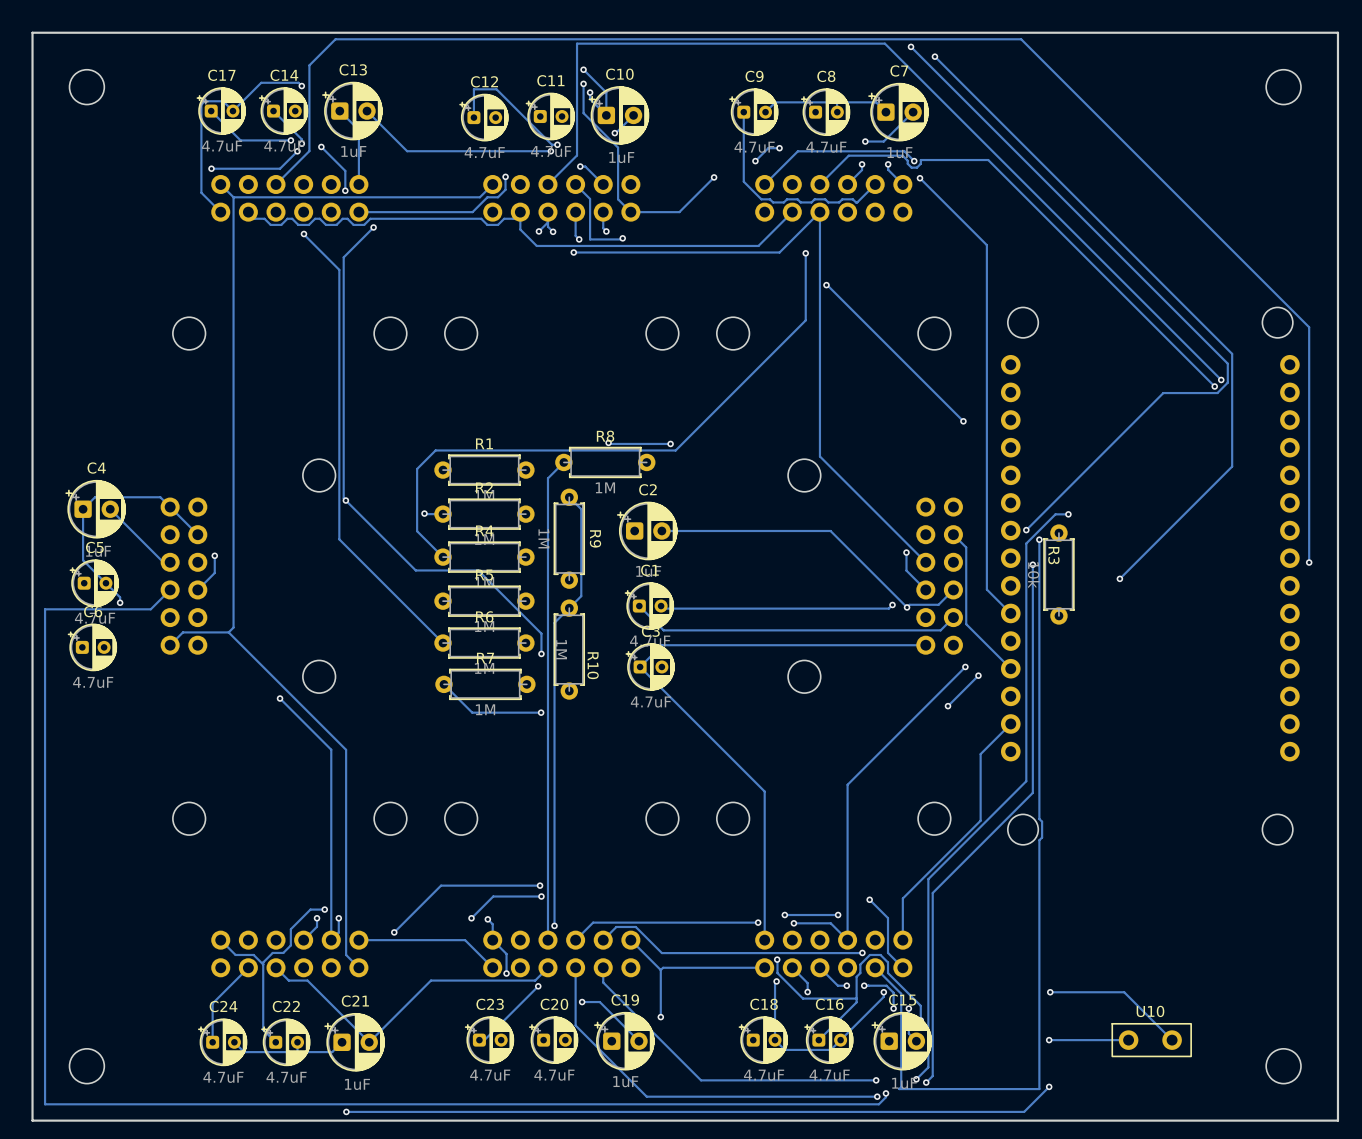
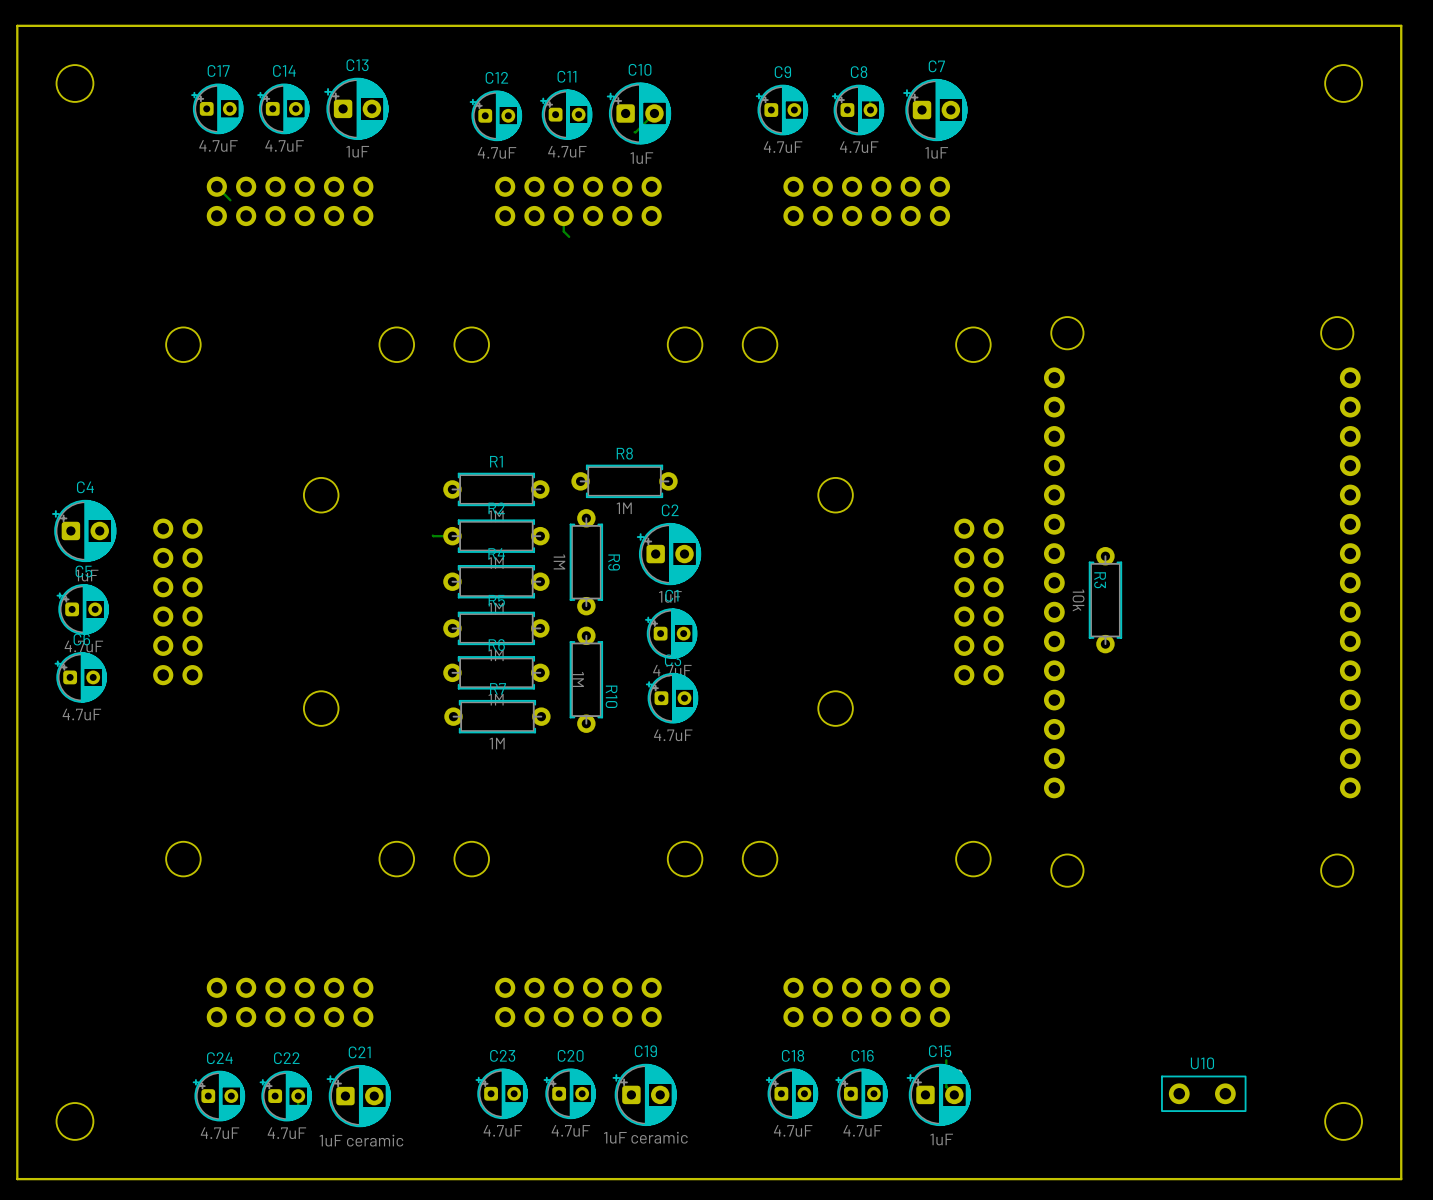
track: (911, 46) (1227, 363) (1227, 382) (1217, 393) (1163, 393) (1026, 530) -> none
via: (911, 46) -> none
track: (934, 56) (1232, 353) (1232, 466) (1119, 578) -> none
via: (934, 56) -> none
track: (583, 69) (606, 92) (606, 115) (590, 99) (590, 92) -> none
via: (583, 69) -> none
track: (583, 83) (583, 113) (618, 147) (618, 199) (630, 212) (679, 212) (714, 177) -> none
via: (583, 83) -> none
track: (301, 86) (298, 82) (261, 82) (232, 111) (223, 101) (204, 101) (201, 104) (201, 192) (220, 212) -> none
via: (301, 86) -> none
via: (590, 92) -> none
track: (211, 111) (240, 140) (290, 140) -> none
track: (273, 111) (301, 139) (301, 143) -> none
track: (339, 111) (358, 130) (358, 184) -> none
track: (367, 111) (407, 151) (550, 151) -> none
track: (743, 112) (743, 181) (761, 199) (769, 199) (773, 202) (783, 202) (787, 199) (797, 199) (800, 202) (811, 202) (814, 199) (839, 202) (842, 199) (852, 199) (857, 202) (875, 184) -> none
track: (885, 112) (876, 102) (775, 102) (765, 112) -> none
track: (913, 112) (883, 141) (865, 141) -> none
track: (473, 117) (473, 89) (496, 89) (552, 144) (557, 144) -> none
via: (614, 133) -> none
via: (290, 140) -> none
via: (865, 141) -> none
via: (301, 143) -> none
via: (557, 144) -> none
track: (321, 146) (345, 170) (345, 190) -> none
via: (321, 146) -> none
track: (779, 148) (768, 148) (755, 161) -> none
via: (779, 148) -> none
track: (297, 151) (280, 168) (211, 168) -> none
via: (297, 151) -> none
via: (550, 151) -> none
via: (755, 161) -> none
track: (914, 161) (904, 151) (797, 151) (764, 184) -> none
via: (914, 161) -> none
track: (862, 164) (862, 170) (847, 184) -> none
via: (862, 164) -> none
track: (888, 164) (888, 169) (902, 184) -> none
via: (888, 164) -> none
track: (580, 166) (585, 166) (603, 184) -> none
via: (580, 166) -> none
via: (211, 168) -> none
track: (505, 176) (505, 189) (498, 197) (487, 197) (472, 212) (358, 212) -> none
via: (505, 176) -> none
via: (714, 177) -> none
track: (919, 178) (986, 245) (986, 589) (1010, 613) -> none
via: (919, 178) -> none
track: (276, 184) (309, 151) (309, 65) (335, 39) (1021, 39) (1309, 327) (1309, 562) -> none
track: (492, 184) (479, 197) (233, 197) (233, 627) (228, 632) -> none
track: (547, 184) (577, 155) (577, 43) (884, 43) (1221, 379) -> none
track: (575, 184) (590, 198) (590, 239) (622, 238) -> none
track: (819, 184) (848, 155) (902, 155) (911, 167) (916, 167) (920, 163) (920, 160) (988, 160) (1214, 386) -> none
via: (345, 190) -> none
track: (575, 212) (575, 235) (579, 239) -> none
track: (603, 212) (603, 228) (606, 231) -> none
track: (792, 212) (758, 245) (536, 245) (520, 229) (520, 212) (513, 218) (504, 218) (498, 224) (487, 224) (481, 218) (370, 218) (364, 224) (353, 224) (347, 218) (342, 218) (336, 224) (325, 224) (319, 218) (315, 218) (308, 224) (298, 224) (292, 218) (287, 218) (281, 224) (270, 224) (264, 218) (255, 218) (248, 212) -> none
track: (547, 222) (538, 231) -> none
track: (373, 227) (343, 257) (343, 498) (415, 570) (478, 570) (541, 633) (541, 653) -> none
via: (373, 227) -> none
via: (538, 231) -> none
via: (553, 231) -> none
via: (606, 231) -> none
track: (303, 234) (339, 269) (339, 539) (443, 643) -> none
via: (303, 234) -> none
via: (622, 238) -> none
via: (579, 239) -> none
track: (573, 252) (779, 252) (819, 212) (819, 456) (925, 562) -> none
via: (573, 252) -> none
track: (805, 253) (805, 320) (675, 450) (435, 450) (417, 468) (417, 531) (443, 557) -> none
via: (805, 253) -> none
track: (826, 285) (963, 421) -> none
via: (826, 285) -> none
via: (1221, 379) -> none
via: (1214, 386) -> none
via: (963, 421) -> none
track: (608, 442) (670, 443) -> none
via: (608, 442) -> none
via: (670, 443) -> none
track: (563, 462) (547, 478) (547, 940) -> none
track: (569, 497) (581, 509) (581, 596) (554, 622) (554, 925) -> none
via: (345, 500) -> none
track: (110, 509) (163, 562) (170, 562) -> none
via: (424, 513) -> none
track: (1068, 514) (1055, 514) (1026, 543) (1026, 781) (928, 879) (928, 1067) (916, 1079) -> none
via: (1068, 514) -> none
track: (661, 530) (830, 530) (907, 607) (909, 604) (938, 604) (953, 589) -> none
via: (1026, 530) -> none
track: (197, 534) (160, 497) (95, 497) (83, 509) (83, 560) (120, 597) (120, 602) -> none
track: (953, 534) (966, 547) (966, 624) (1010, 668) -> none
track: (1039, 539) (1039, 818) (1042, 821) (1042, 837) (1039, 840) (1039, 1089) (899, 1089) (901, 1087) (901, 993) (875, 967) -> none
via: (1039, 539) -> none
track: (906, 552) (906, 570) (925, 589) -> none
via: (906, 552) -> none
track: (214, 555) (214, 572) (197, 589) -> none
via: (214, 555) -> none
via: (1309, 562) -> none
track: (1032, 564) (1032, 792) (932, 893) (932, 1076) (926, 1082) -> none
via: (1032, 564) -> none
via: (1119, 578) -> none
track: (170, 589) (150, 609) (45, 609) (45, 1104) (878, 1104) (885, 1097) (885, 1093) -> none
via: (120, 602) -> none
track: (892, 604) (888, 608) (663, 608) (661, 606) -> none
via: (892, 604) -> none
track: (639, 606) (663, 630) (940, 630) (953, 617) -> none
via: (907, 607) -> none
track: (228, 632) (346, 749) (346, 954) (358, 967) -> none
track: (228, 632) (182, 632) (170, 645) -> none
track: (925, 645) (661, 645) (640, 666) (764, 791) (764, 940) -> none
via: (541, 653) -> none
track: (965, 666) (847, 784) (847, 940) (830, 923) (793, 923) -> none
via: (965, 666) -> none
track: (978, 675) (948, 706) -> none
via: (978, 675) -> none
track: (443, 684) (472, 712) (541, 712) -> none
track: (280, 698) (331, 749) (331, 940) (338, 932) (338, 918) -> none
via: (280, 698) -> none
via: (948, 706) -> none
via: (541, 712) -> none
track: (1010, 723) (980, 754) (980, 820) (902, 898) (902, 940) -> none
track: (540, 885) (441, 885) (394, 932) -> none
via: (540, 885) -> none
track: (541, 896) (493, 896) (471, 918) -> none
via: (541, 896) -> none
track: (869, 899) (888, 918) (888, 952) (902, 967) -> none
via: (869, 899) -> none
track: (324, 909) (310, 909) (290, 929) (290, 945) (283, 952) (272, 952) (263, 962) (263, 1029) (275, 1042) -> none
via: (324, 909) -> none
via: (784, 915) -> none
track: (838, 915) (784, 915) -> none
via: (838, 915) -> none
track: (317, 918) (317, 926) (303, 940) -> none
via: (317, 918) -> none
via: (338, 918) -> none
via: (471, 918) -> none
track: (487, 919) (492, 924) (492, 940) (506, 953) (506, 973) -> none
via: (487, 919) -> none
track: (758, 922) (593, 922) (575, 940) -> none
via: (758, 922) -> none
via: (793, 923) -> none
via: (554, 925) -> none
via: (394, 932) -> none
track: (220, 940) (235, 954) (253, 954) (263, 964) -> none
track: (358, 940) (465, 940) (492, 967) -> none
track: (603, 940) (616, 926) (635, 926) (661, 953) (862, 953) -> none
track: (630, 940) (660, 970) -> none
via: (862, 952) -> none
track: (777, 959) (777, 973) (802, 998) (856, 998) -> none
via: (777, 959) -> none
track: (248, 967) (212, 1003) (212, 1042) -> none
track: (547, 967) (535, 980) (430, 980) (369, 1042) (307, 980) (288, 980) (276, 967) -> none
track: (575, 967) (575, 1025) (646, 1096) (877, 1096) -> none
track: (603, 967) (603, 982) (701, 1080) (876, 1080) -> none
track: (764, 967) (663, 967) (660, 970) -> none
track: (792, 967) (807, 983) (807, 992) -> none
track: (819, 967) (837, 985) (846, 985) -> none
track: (660, 970) (660, 1017) -> none
via: (506, 973) -> none
track: (776, 981) (775, 983) (775, 1040) (784, 1049) (830, 1049) (883, 996) (883, 992) -> none
via: (776, 981) -> none
via: (846, 985) -> none
track: (864, 985) (886, 985) (893, 992) (893, 1008) -> none
via: (864, 985) -> none
track: (538, 986) (484, 1040) (479, 1040) -> none
via: (538, 986) -> none
via: (807, 992) -> none
via: (883, 992) -> none
track: (1050, 992) (1124, 992) (1172, 1040) -> none
via: (1050, 992) -> none
track: (582, 1002) (599, 1002) (638, 1041) -> none
via: (582, 1002) -> none
via: (893, 1008) -> none
via: (908, 1008) -> none
via: (660, 1017) -> none
track: (920, 1020) (920, 1005) (888, 973) (888, 962) (880, 954) (869, 954) (860, 964) (860, 973) (856, 976) (856, 1002) (818, 1040) -> none
via: (1049, 1040) -> none
track: (1128, 1040) (1049, 1040) -> none
track: (342, 1042) (332, 1052) (244, 1052) (234, 1042) -> none
via: (916, 1079) -> none
via: (876, 1080) -> none
C19 value: 1uF (625, 1081) -> 1uF ceramic (645, 1137)
via: (926, 1082) -> none
C21 value: 1uF (357, 1084) -> 1uF ceramic (361, 1140)
track: (1049, 1086) (1024, 1111) (346, 1111) -> none
via: (1049, 1086) -> none
via: (885, 1093) -> none
via: (877, 1096) -> none
via: (346, 1111) -> none

